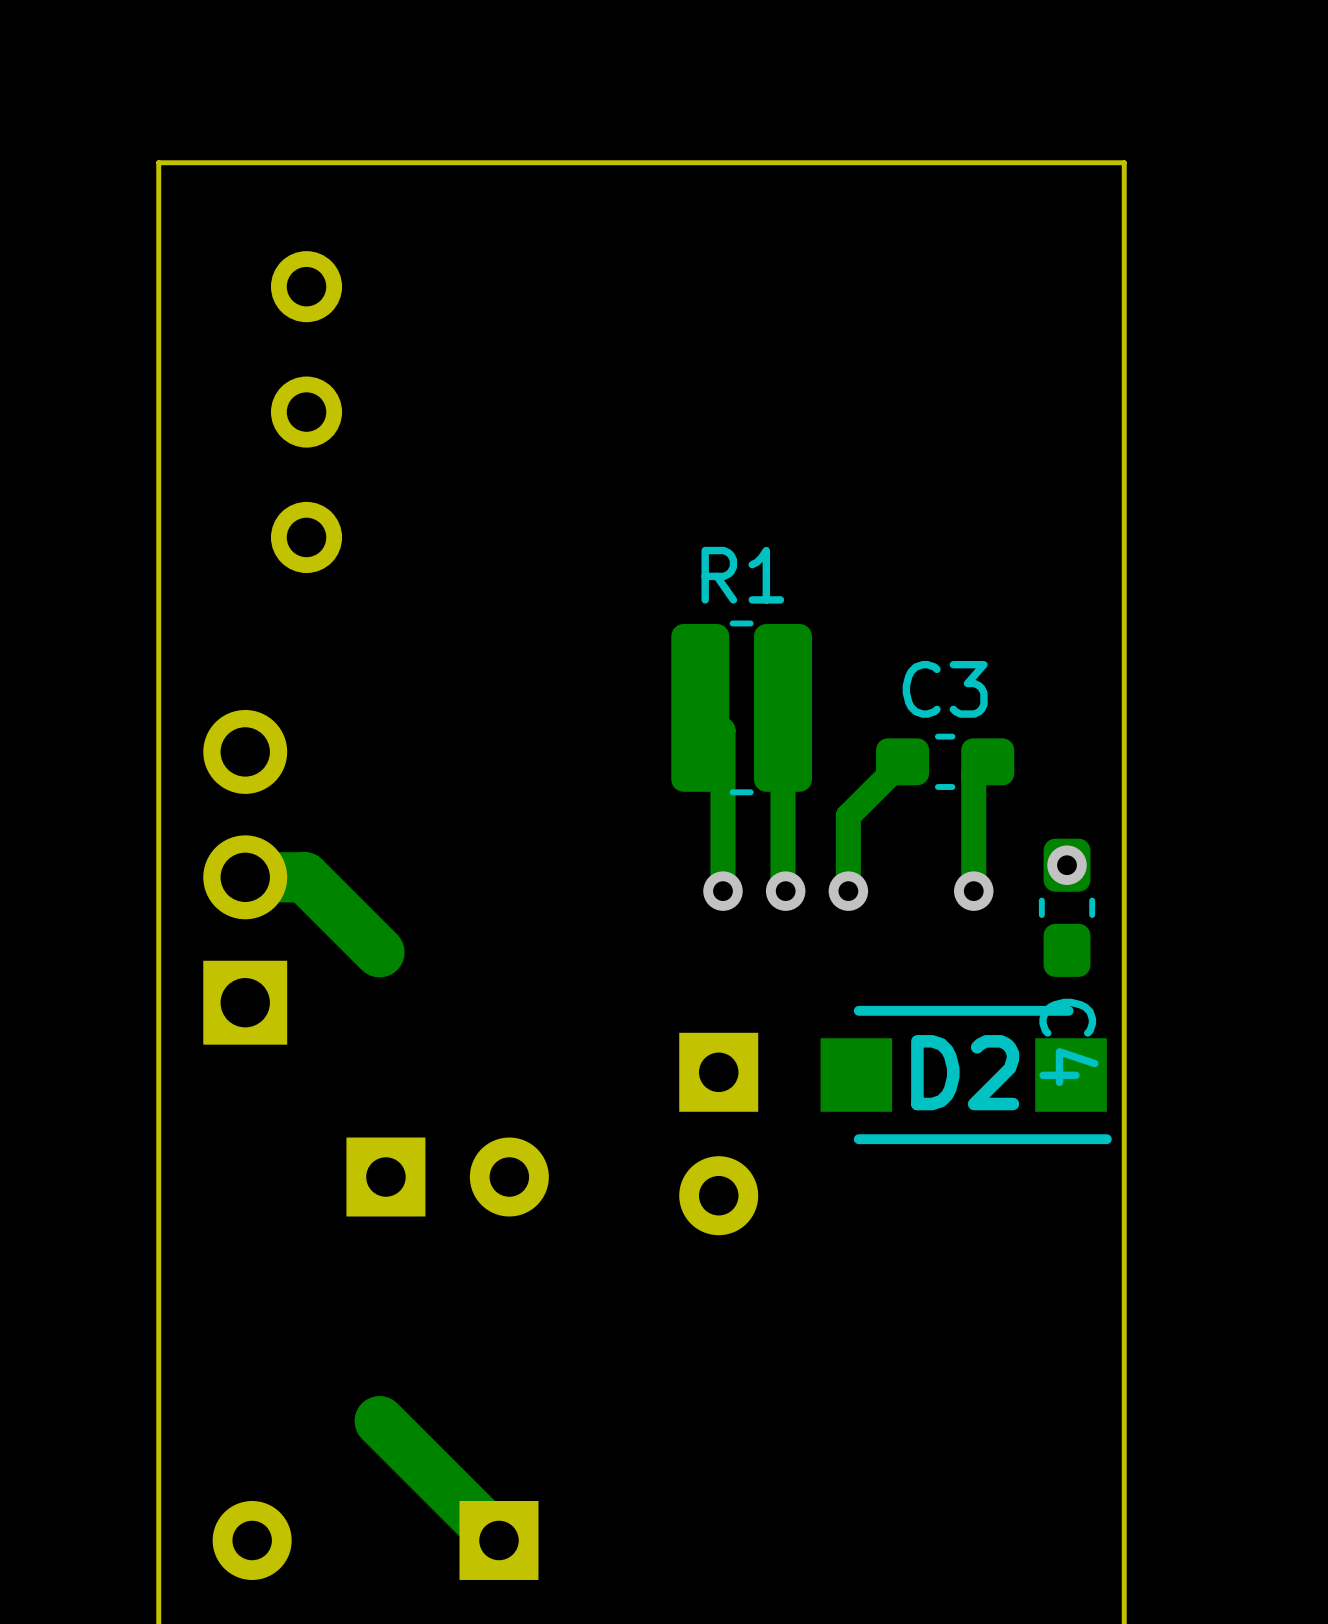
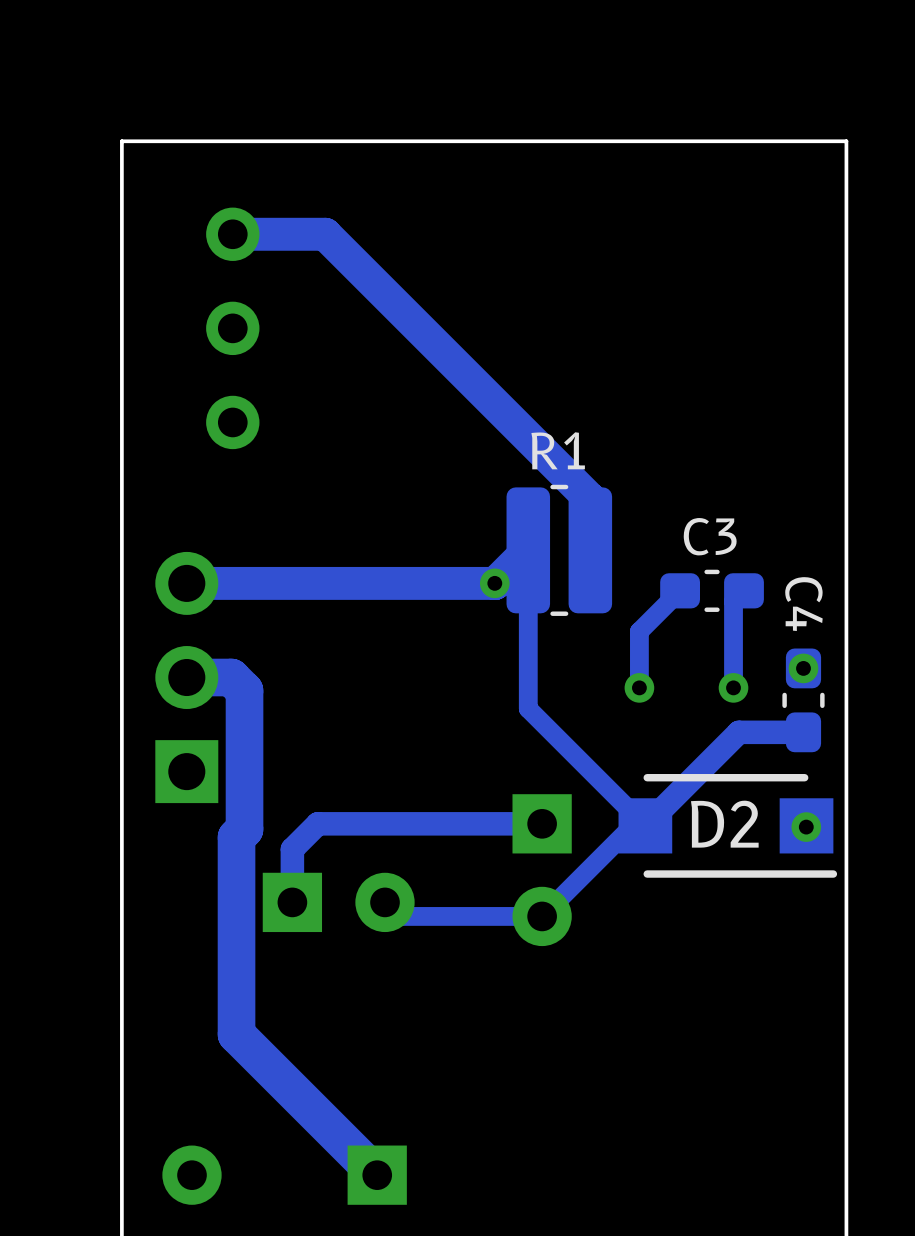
track: (700, 707) (722, 730) (722, 891) -> none
track: (782, 707) (782, 888) (785, 891) -> (590, 550) (590, 499) (325, 234) (232, 234)
track: none -> (186, 583) (495, 583) (528, 550) (528, 708) (645, 825) (738, 732) (803, 732)
via: none -> (494, 583)
via: (722, 891) -> none
via: (785, 891) -> none
track: (322, 894) (379, 952) -> (244, 690) (244, 829) (236, 837) (236, 1034) (287, 1085)
C4 name position: C4 (1068, 1042) -> C4 (803, 604)
track: none -> (542, 823) (317, 823) (292, 849) (292, 902)
track: none -> (632, 825) (542, 916) (399, 916)
via: none -> (806, 827)

